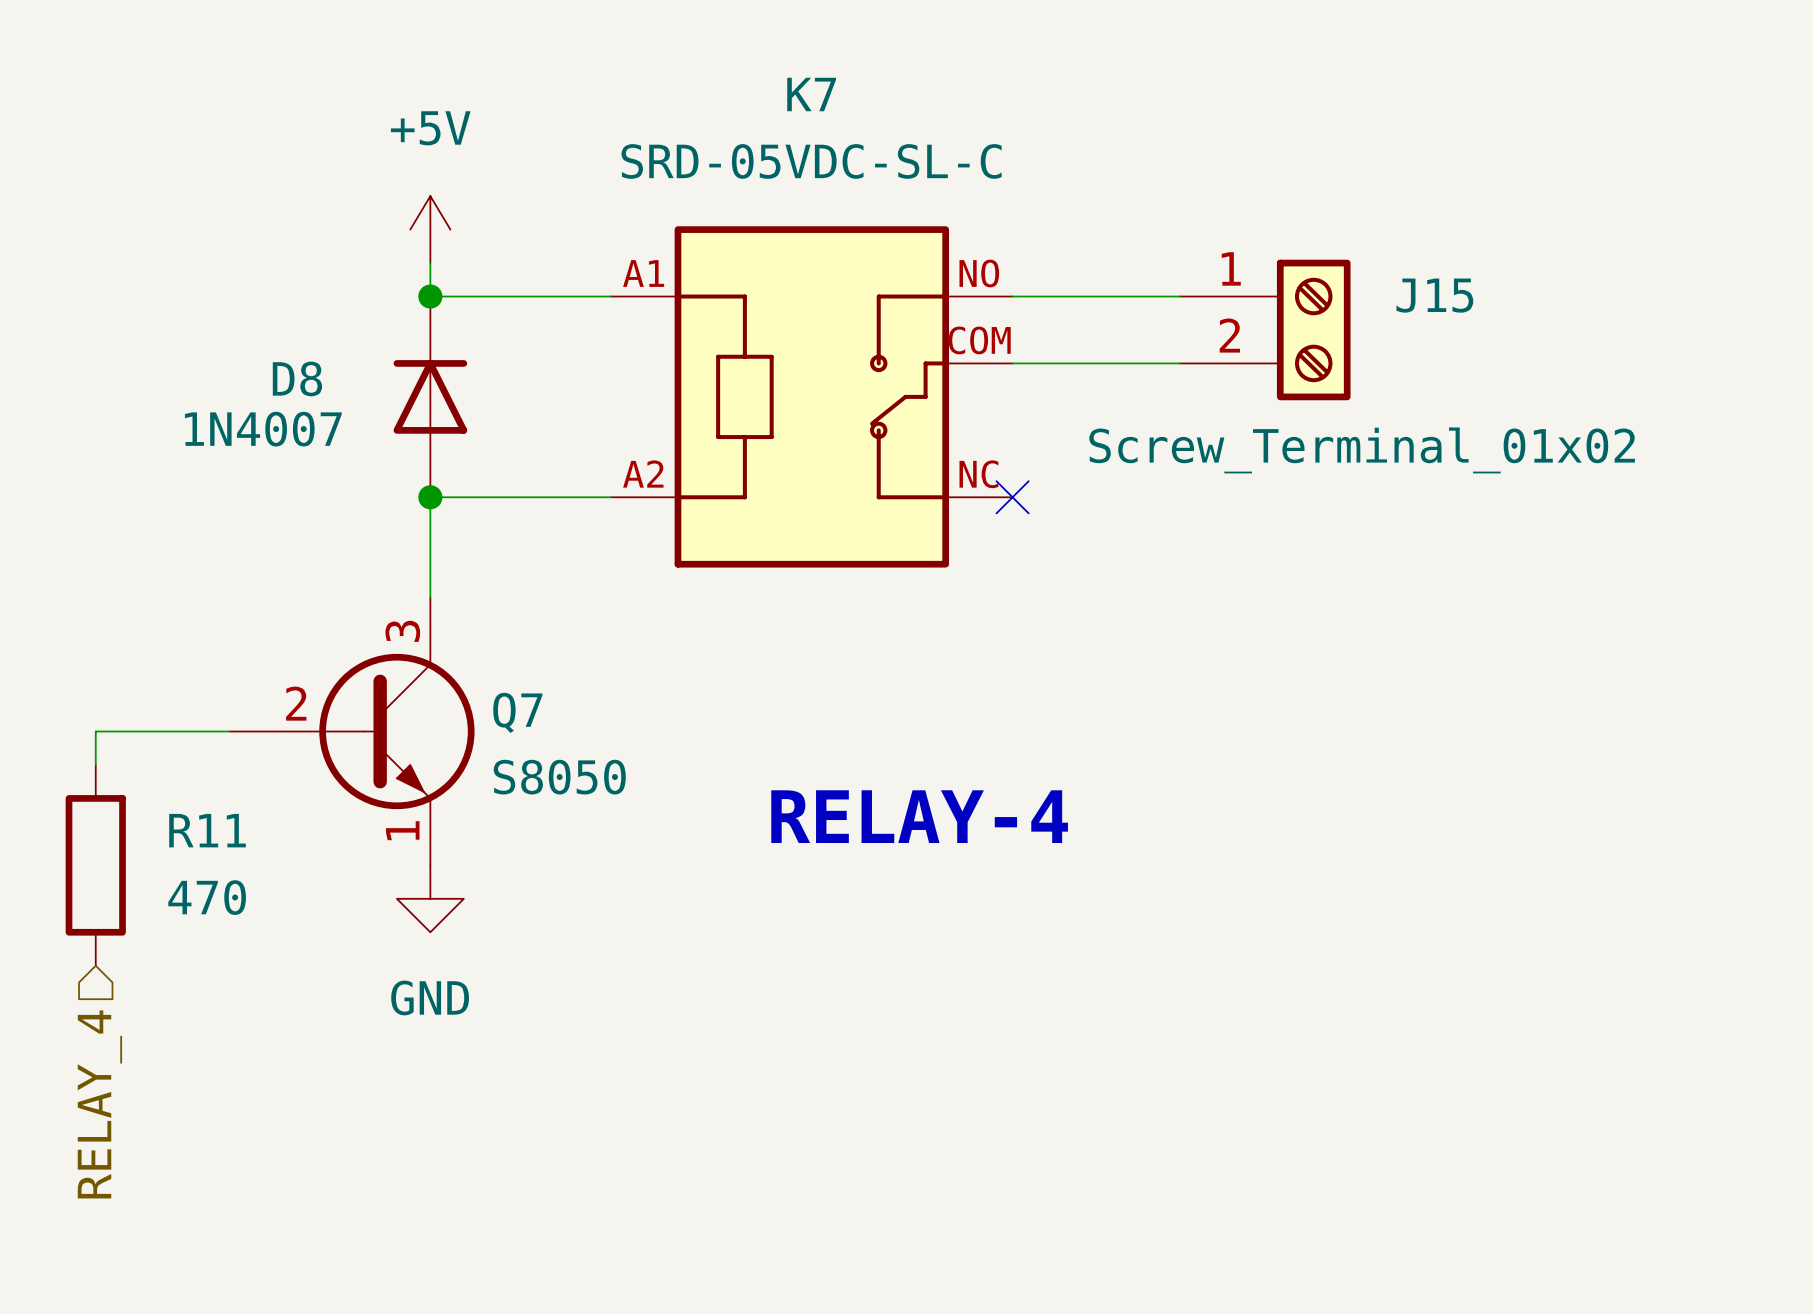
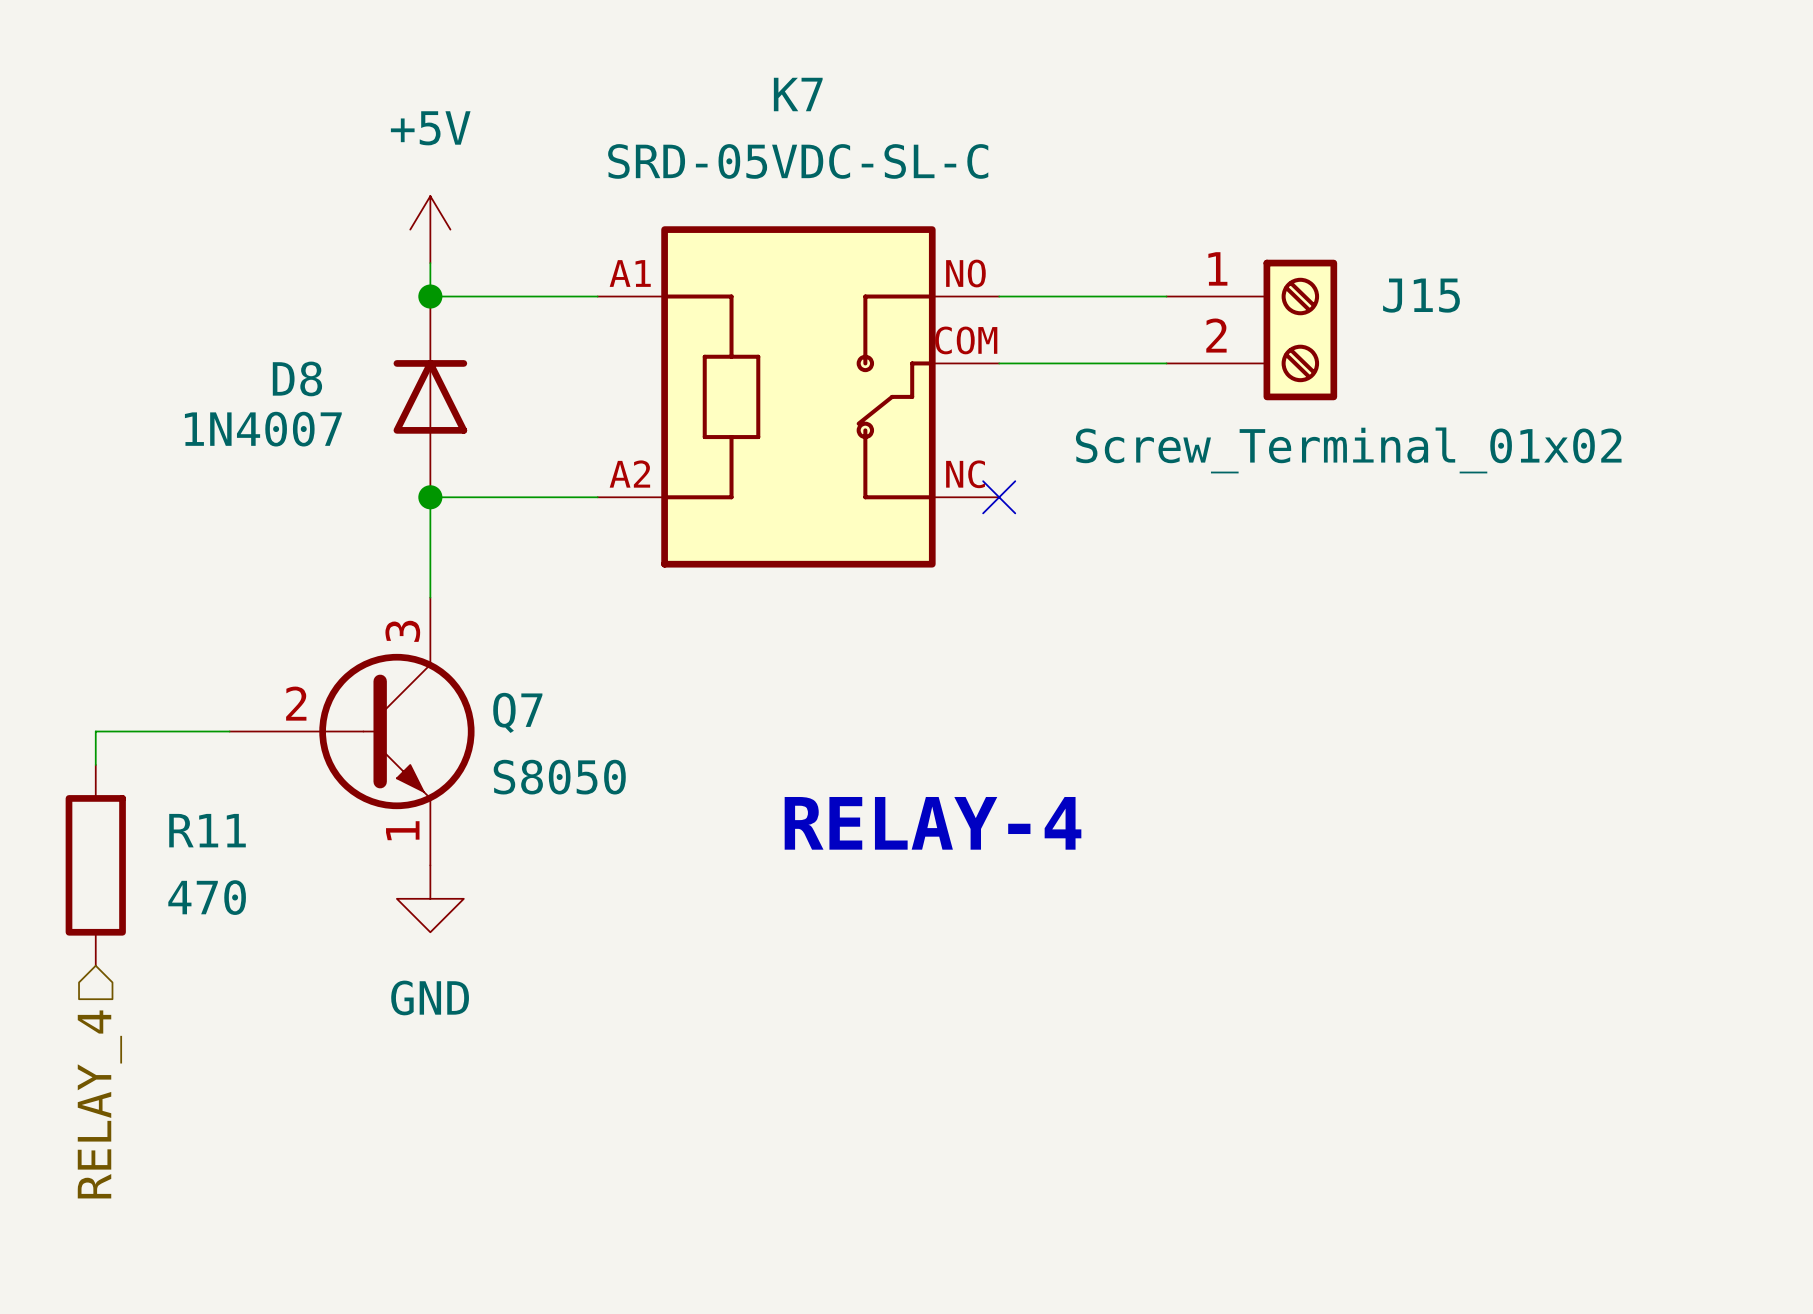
J15 position: (1265, 329) -> (1251, 329)
K7 position: (811, 396) -> (798, 396)
no-connect mark position: (1012, 497) -> (999, 497)
text position: RELAY-4 (919, 816) -> RELAY-4 (933, 823)

